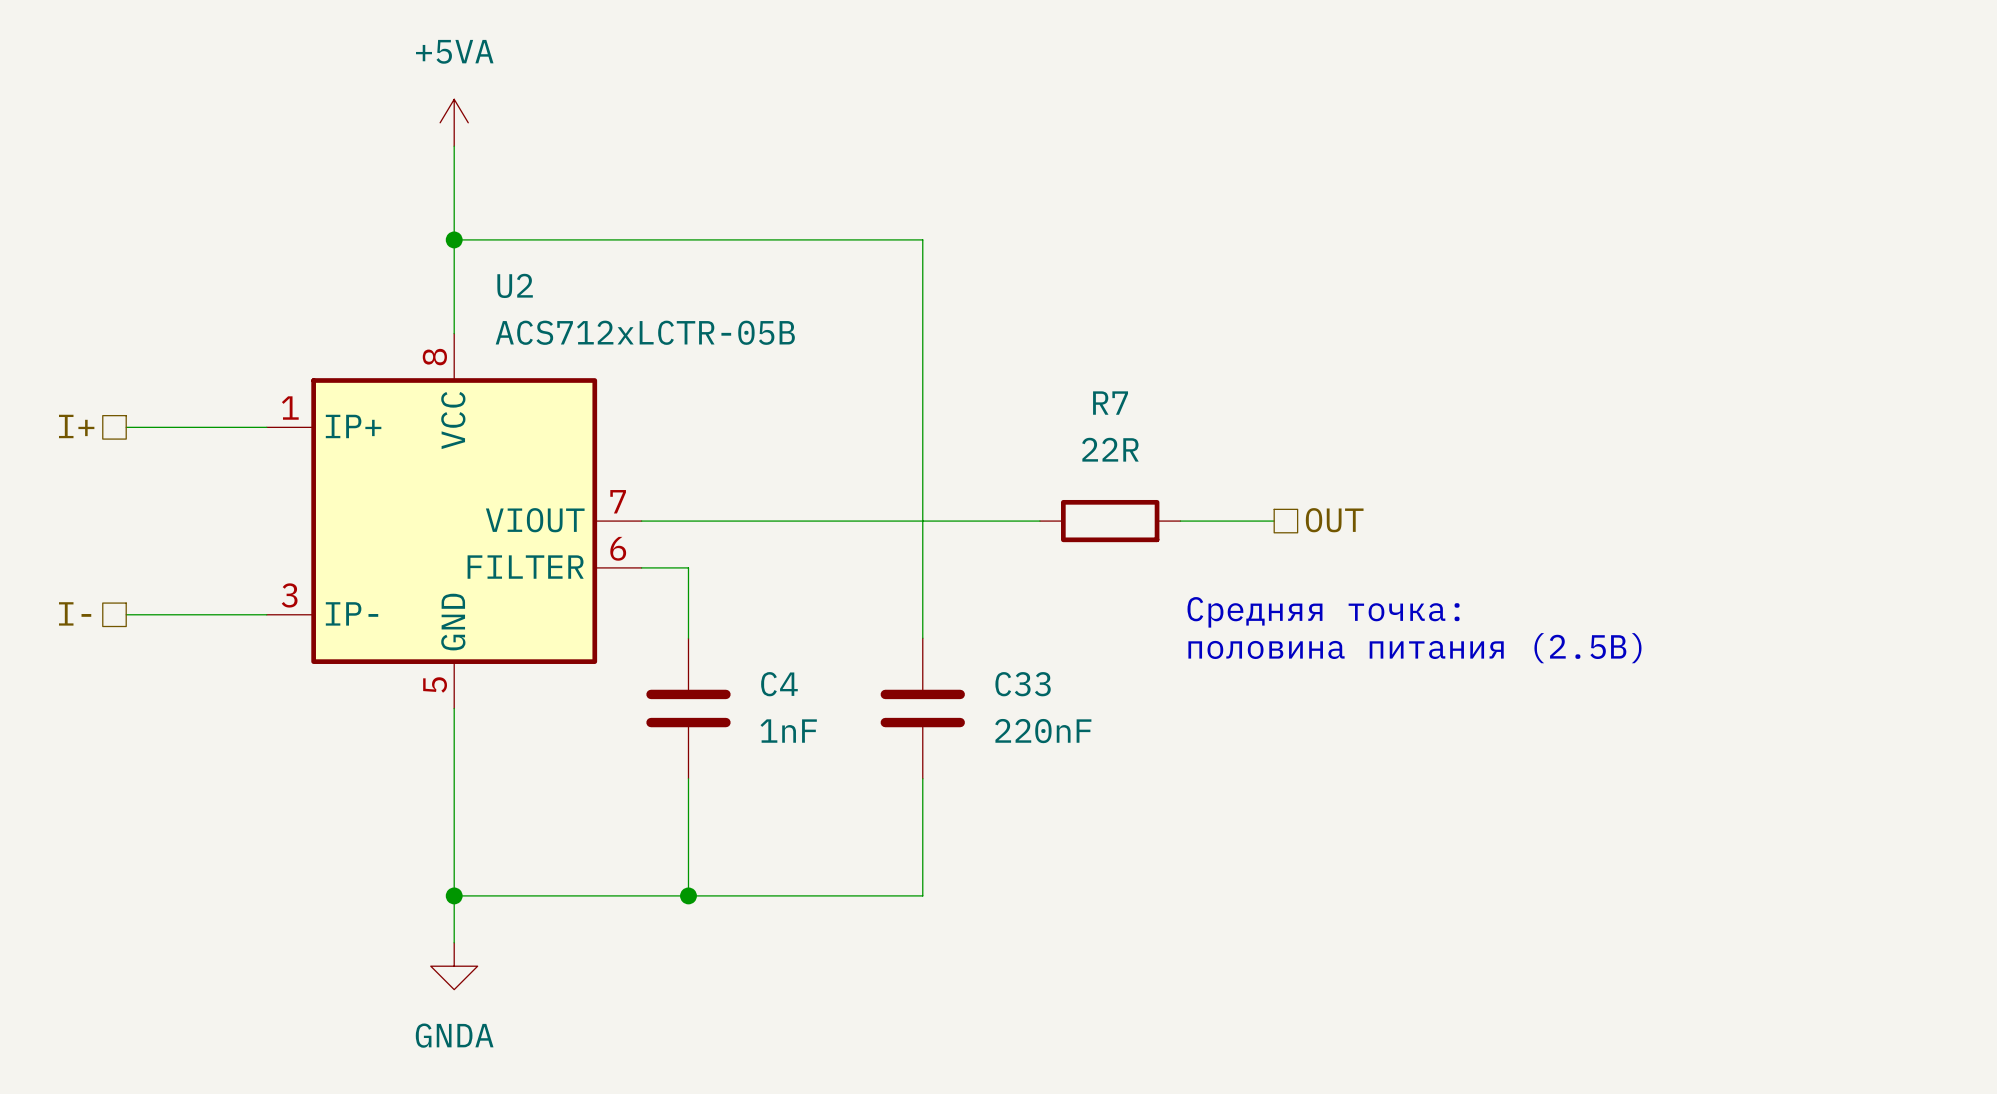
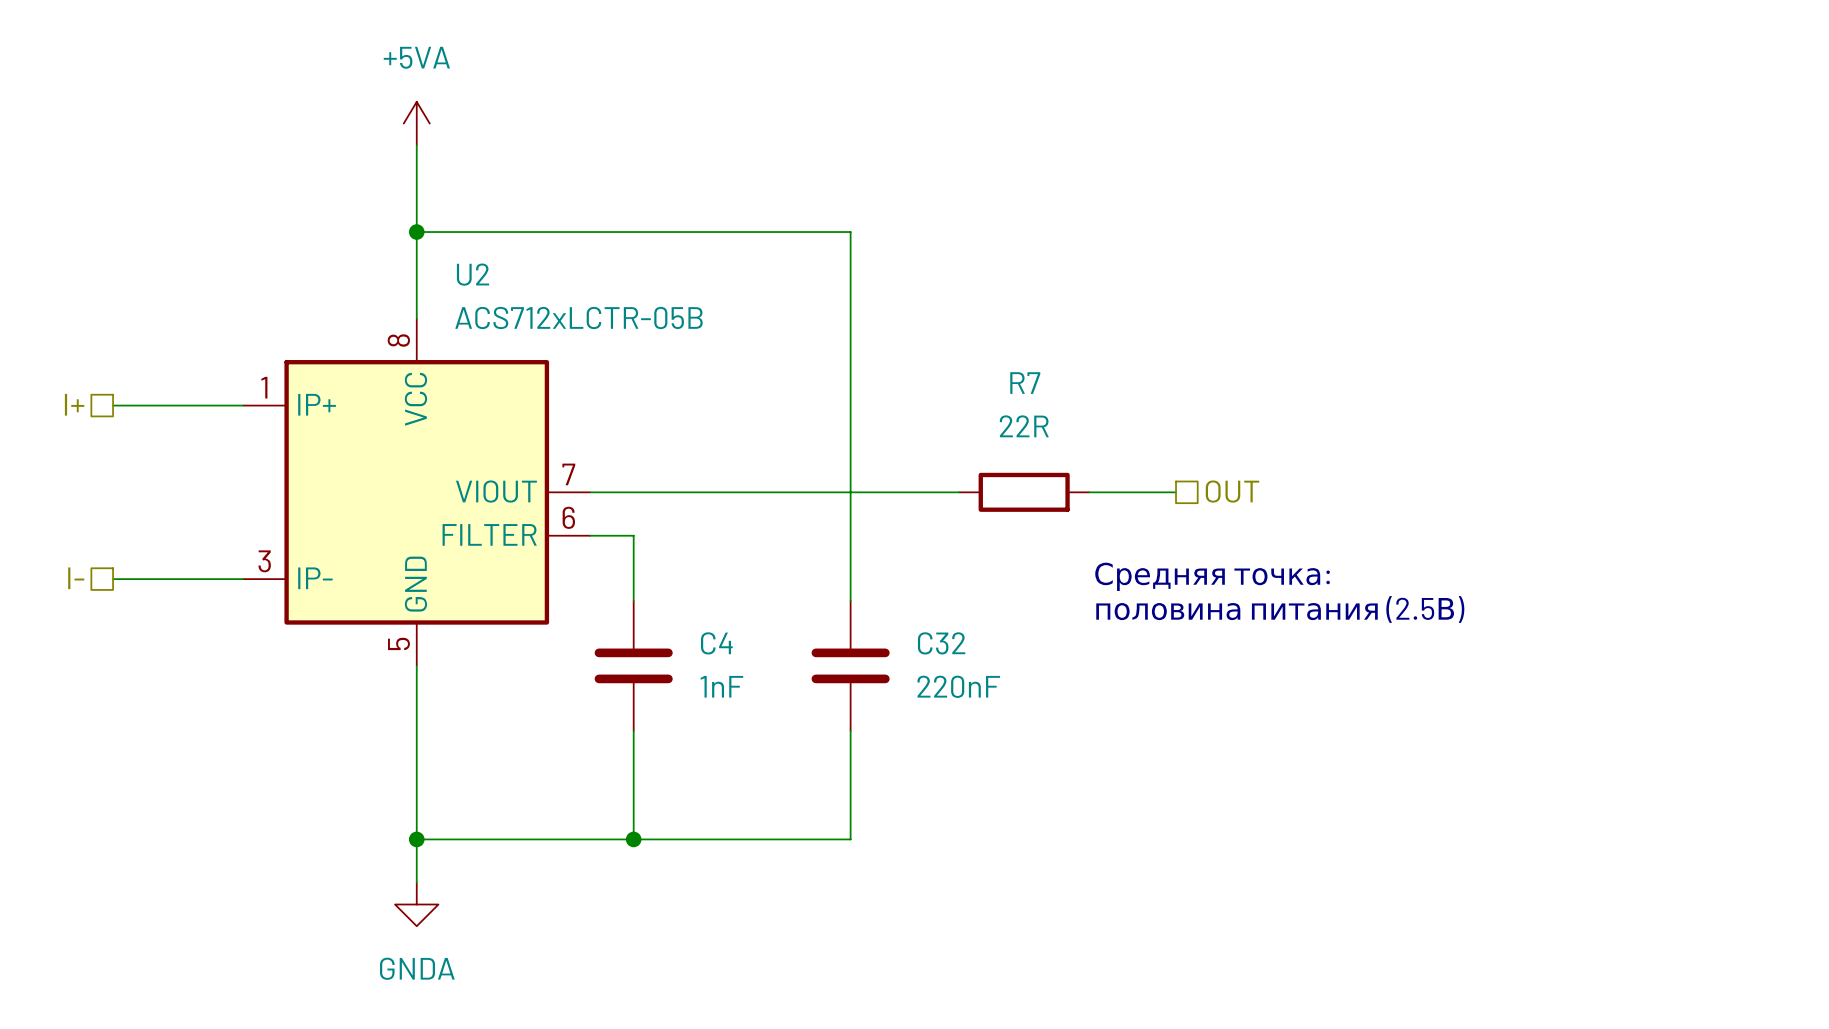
C33 name: C33 (1023, 684) -> C32 (941, 643)

